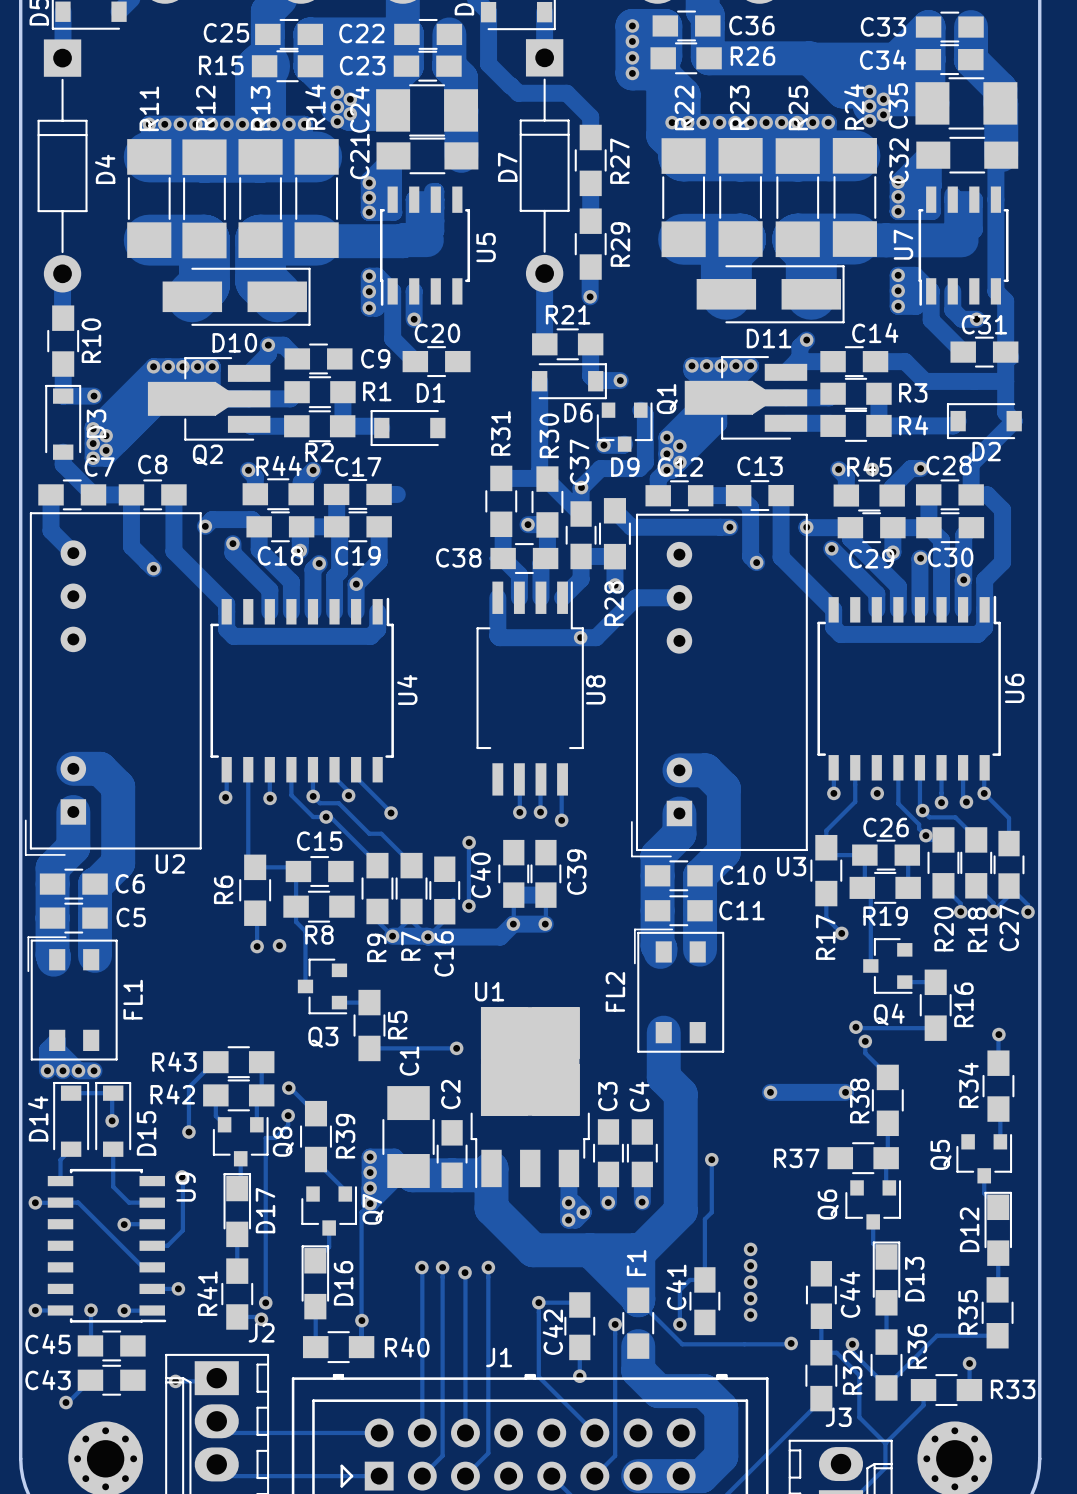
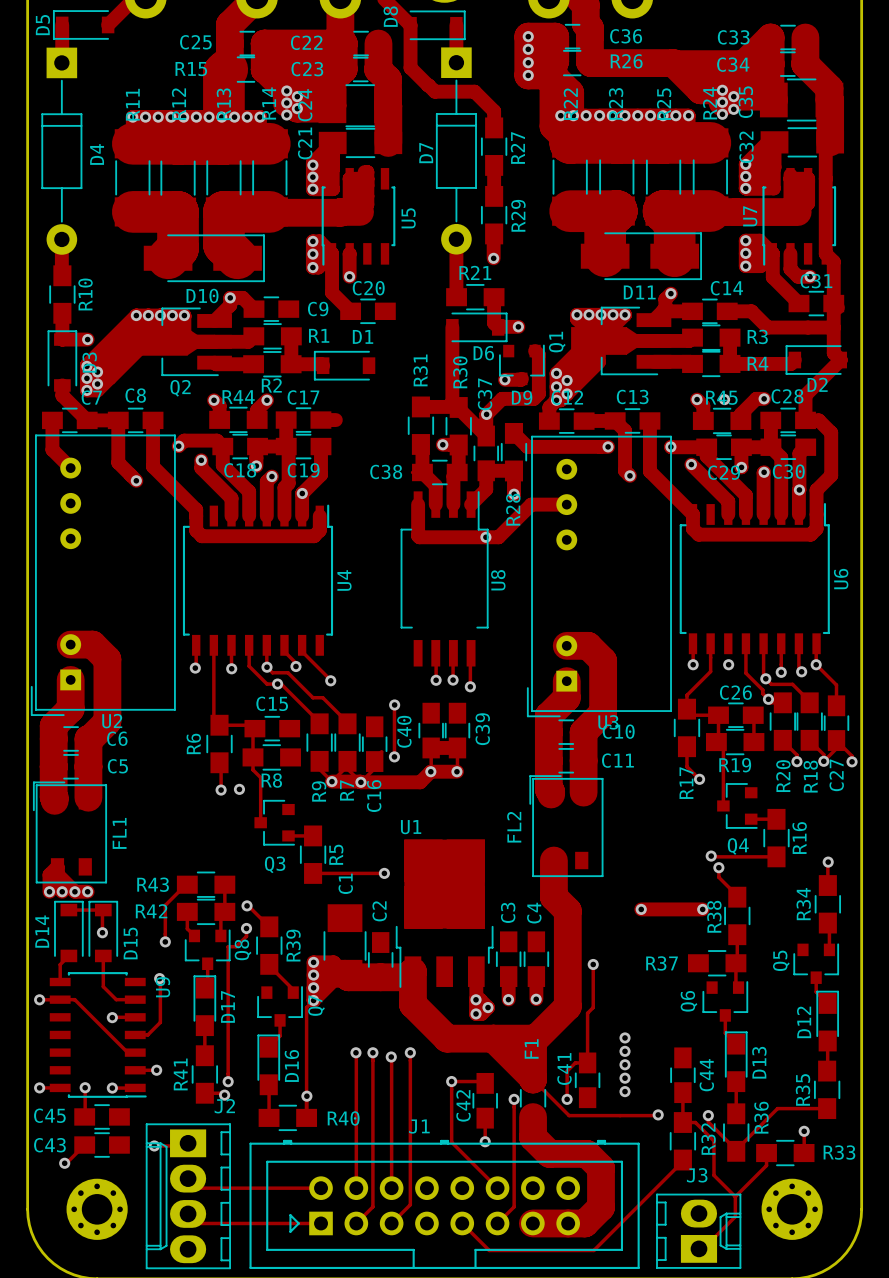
U2 name position: U2 (170, 863) -> U2 (112, 721)
U3 name position: U3 (791, 866) -> U3 (608, 722)

